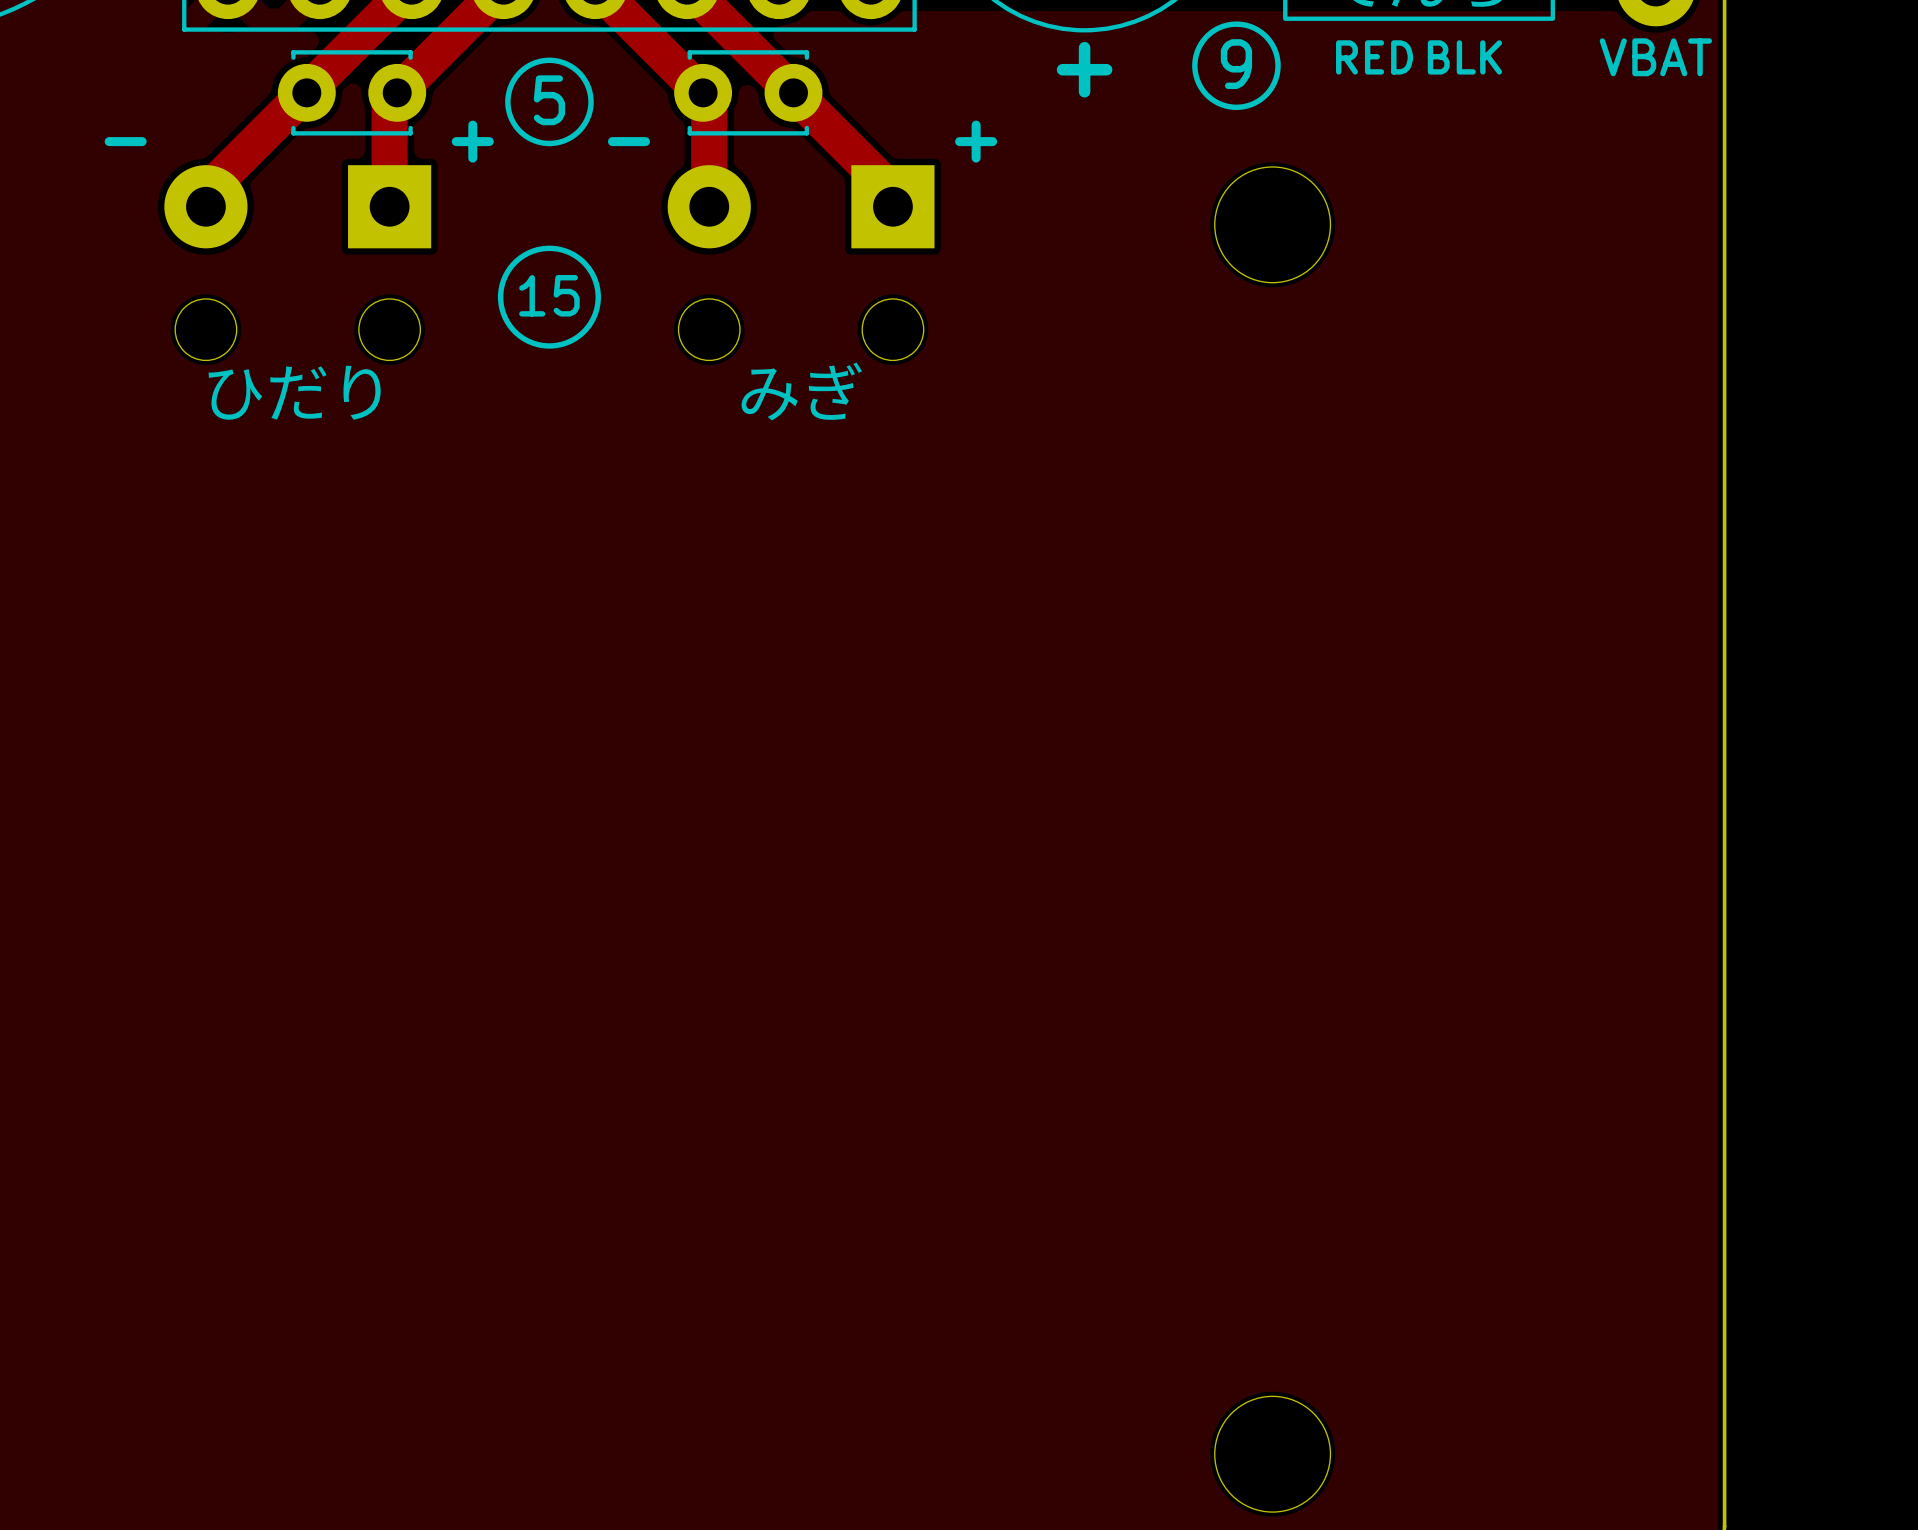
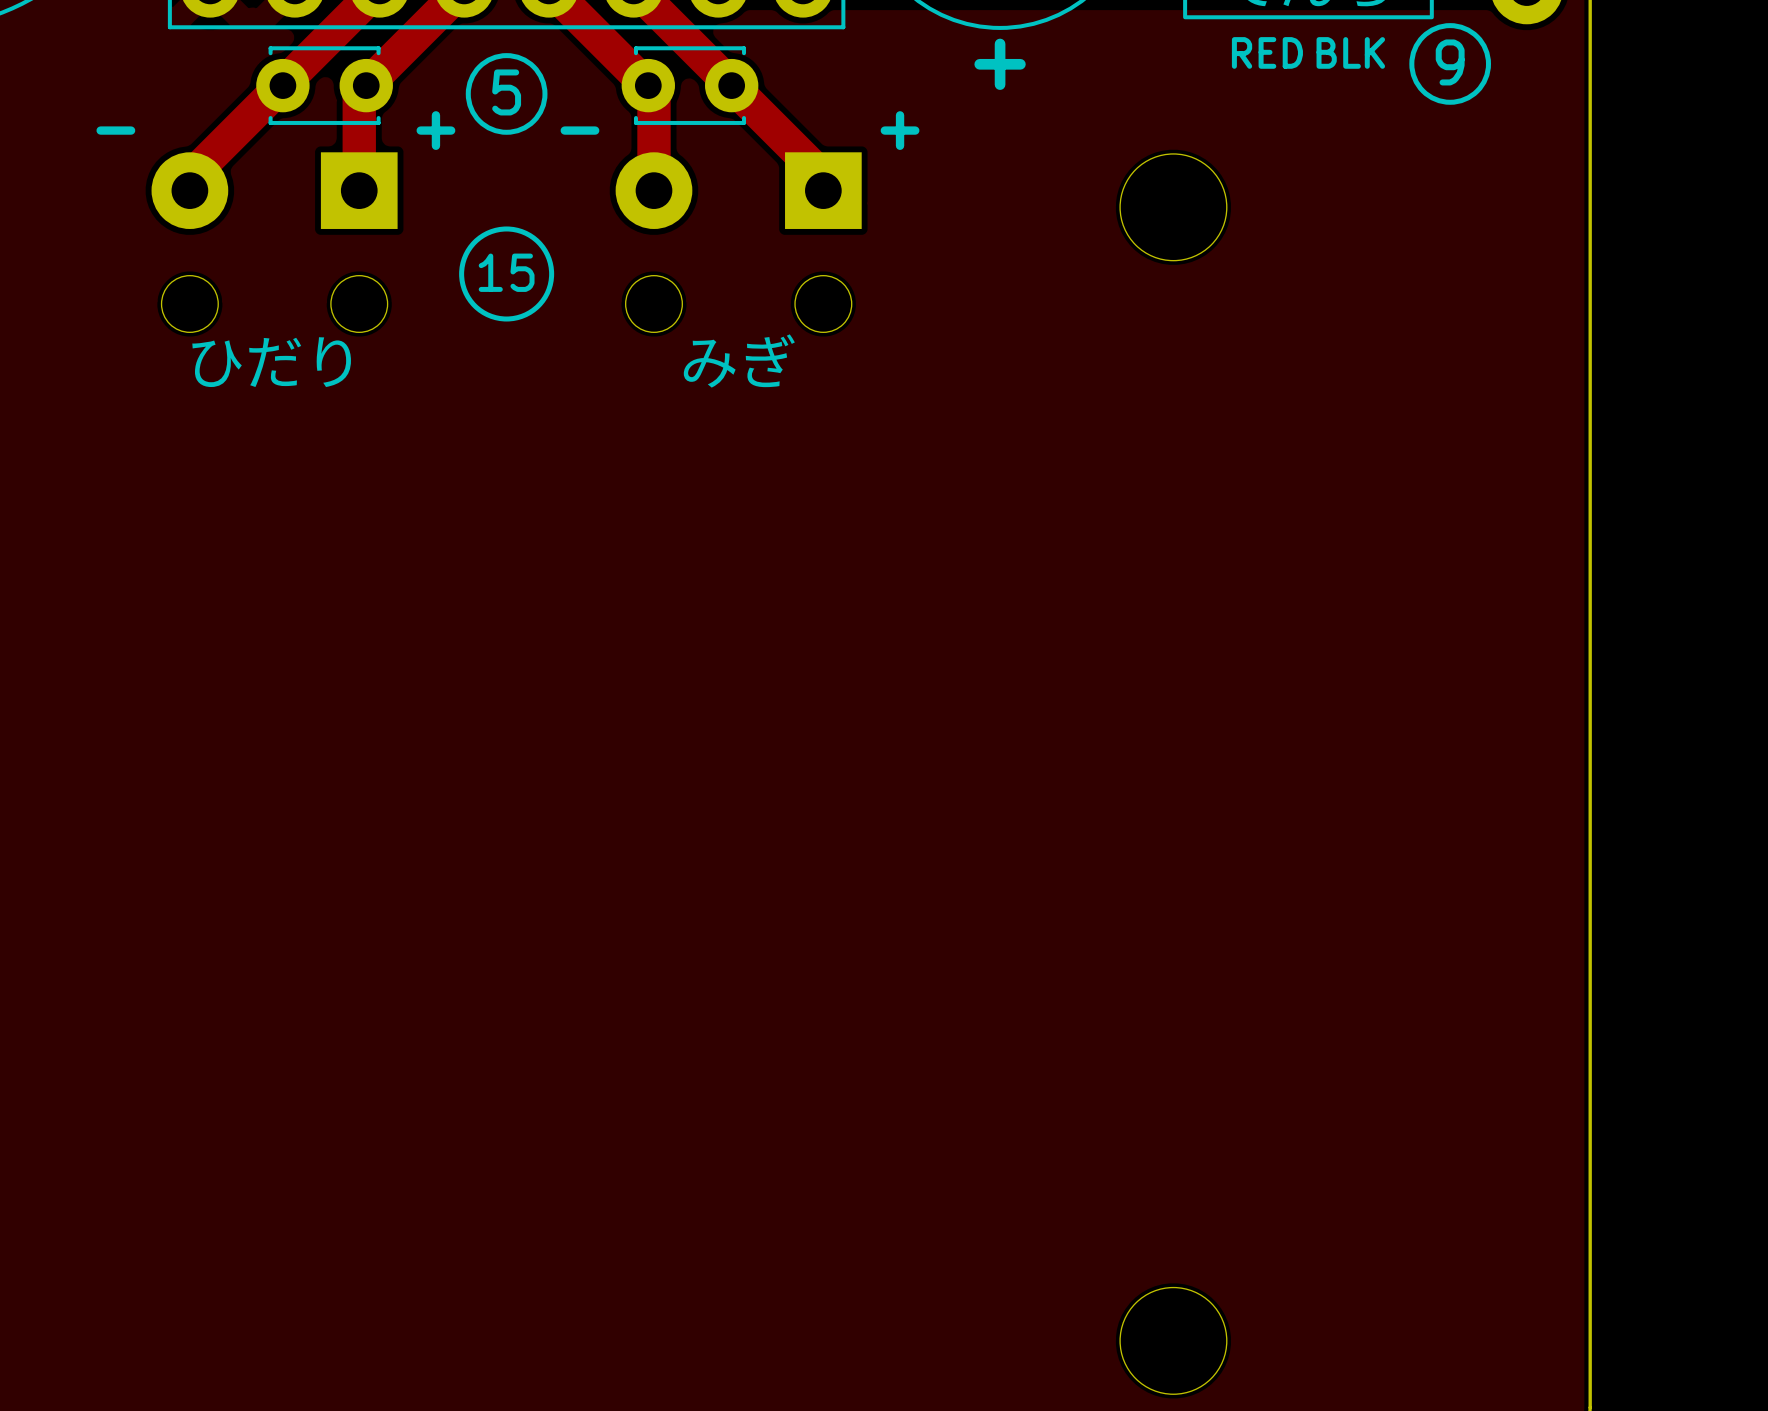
text: VBAT (1655, 57) -> none
text position: 9 (1236, 64) -> 9 (1450, 62)
drawing position: (1236, 65) -> (1450, 63)

